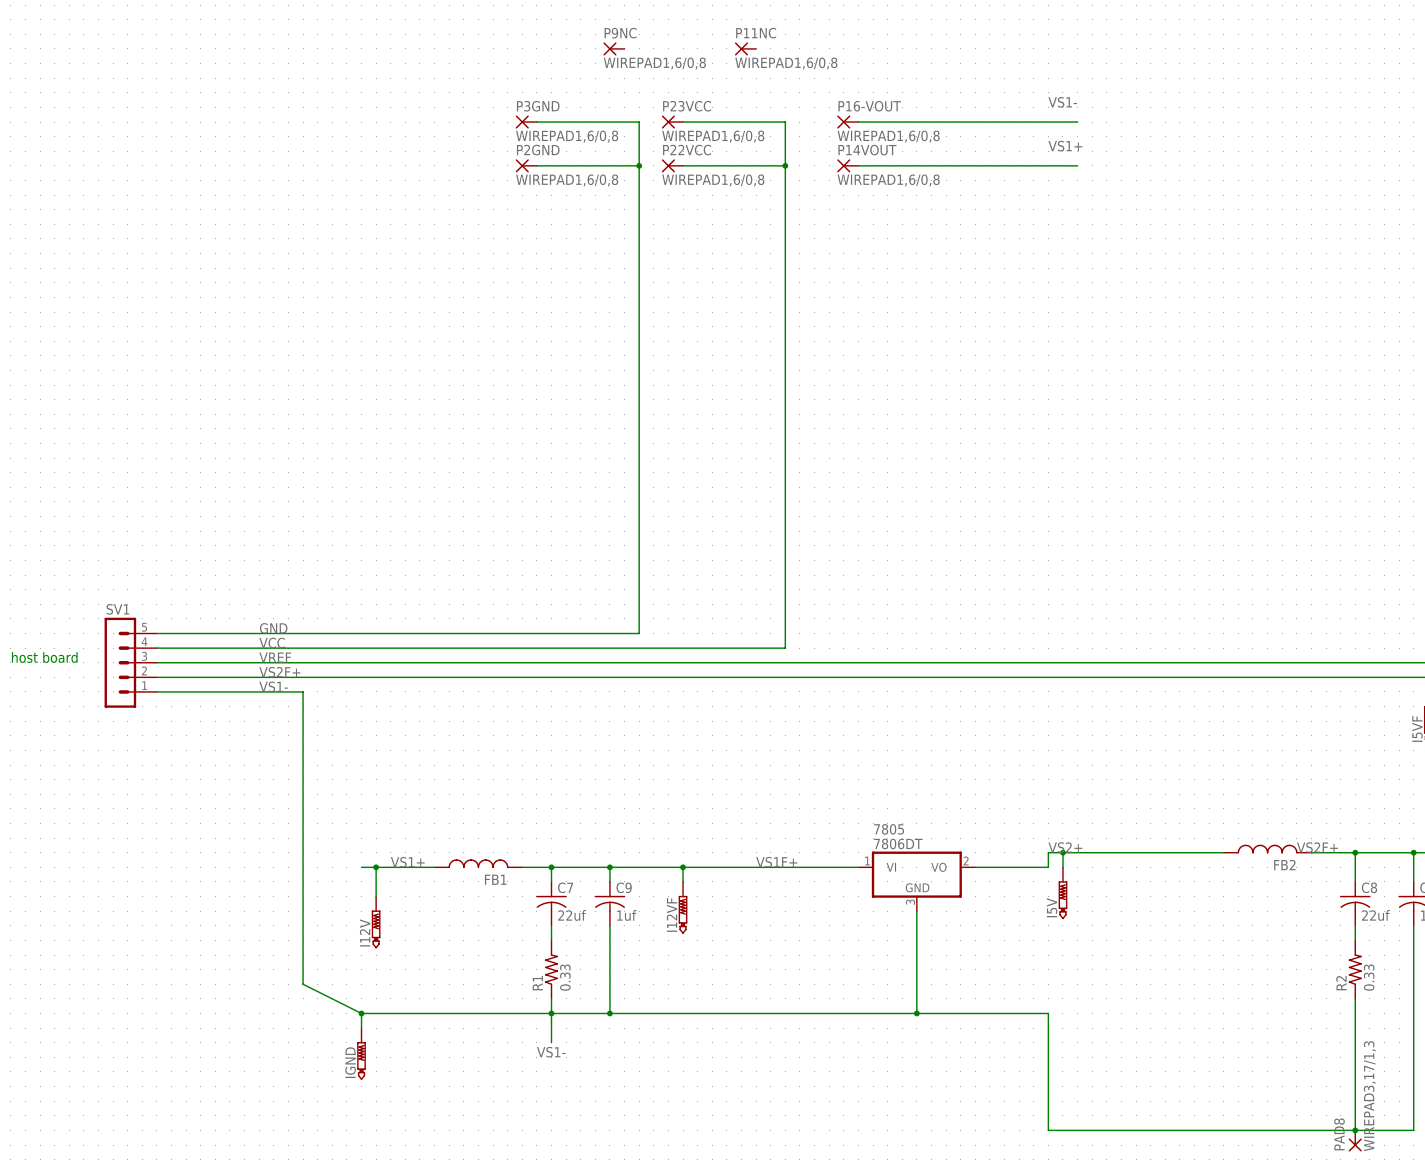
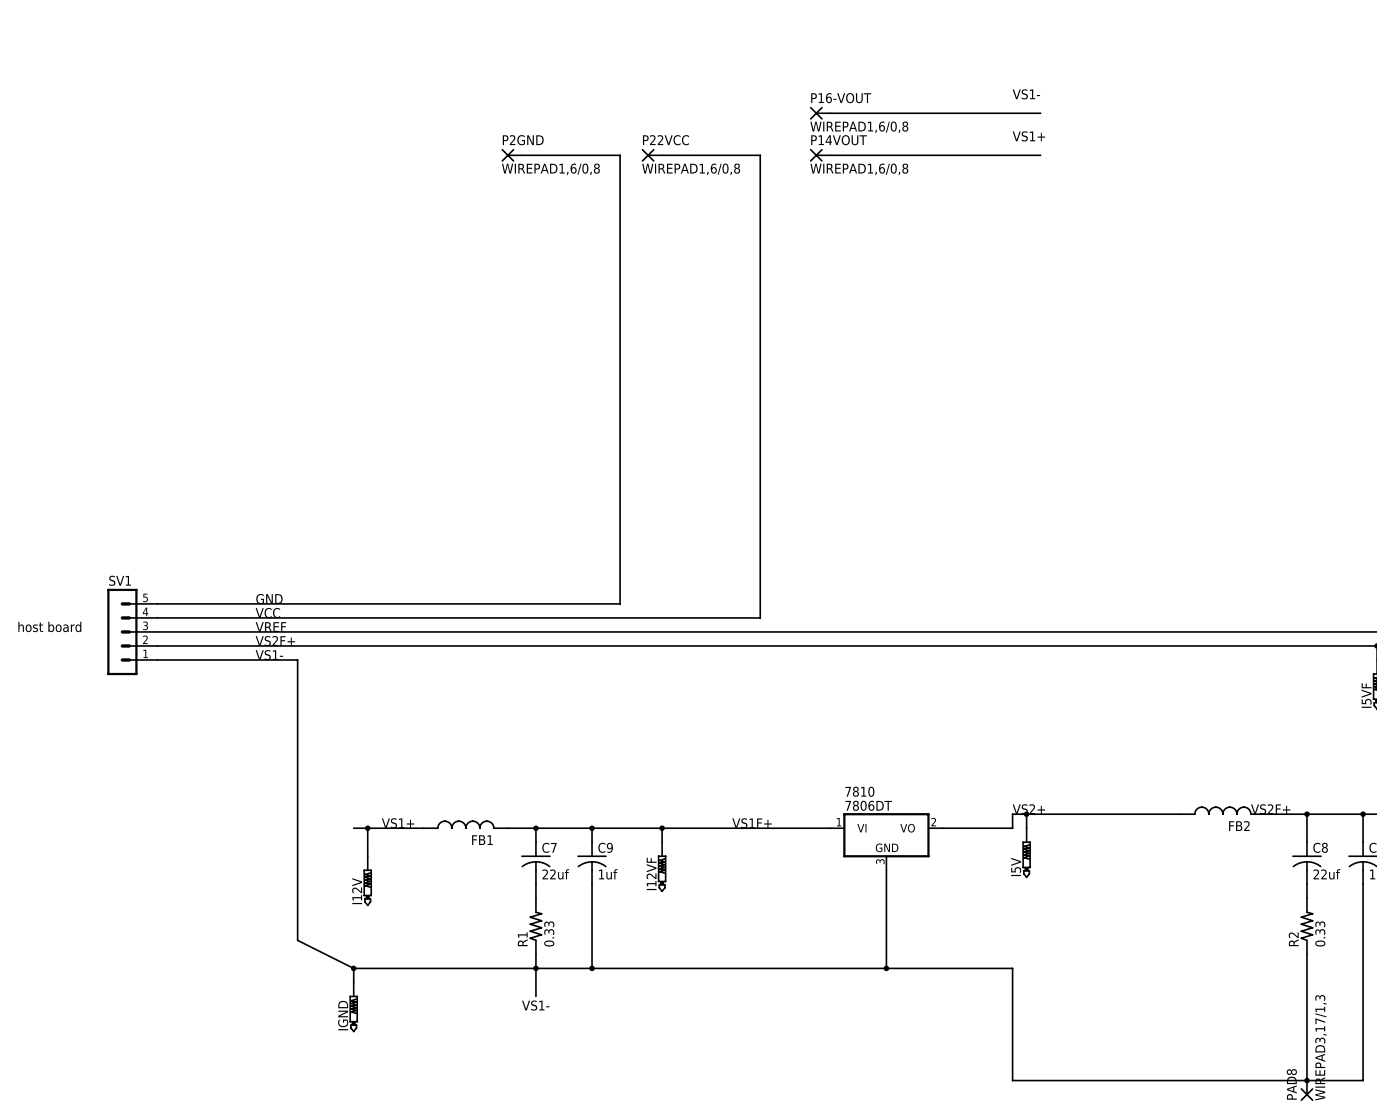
P9NC: WIREPAD1,6/0,8 (613, 48) -> none
P11NC: WIREPAD1,6/0,8 (745, 48) -> none
P3GND: WIREPAD1,6/0,8 (526, 122) -> none
wire: (536, 122) (639, 122) (639, 165) -> none
P23VCC: WIREPAD1,6/0,8 (672, 122) -> none
wire: (683, 122) (785, 122) (785, 165) -> none
junction: (639, 165) -> none
junction: (785, 165) -> none
7805 name: 7805 (889, 829) -> 7810 (859, 791)

